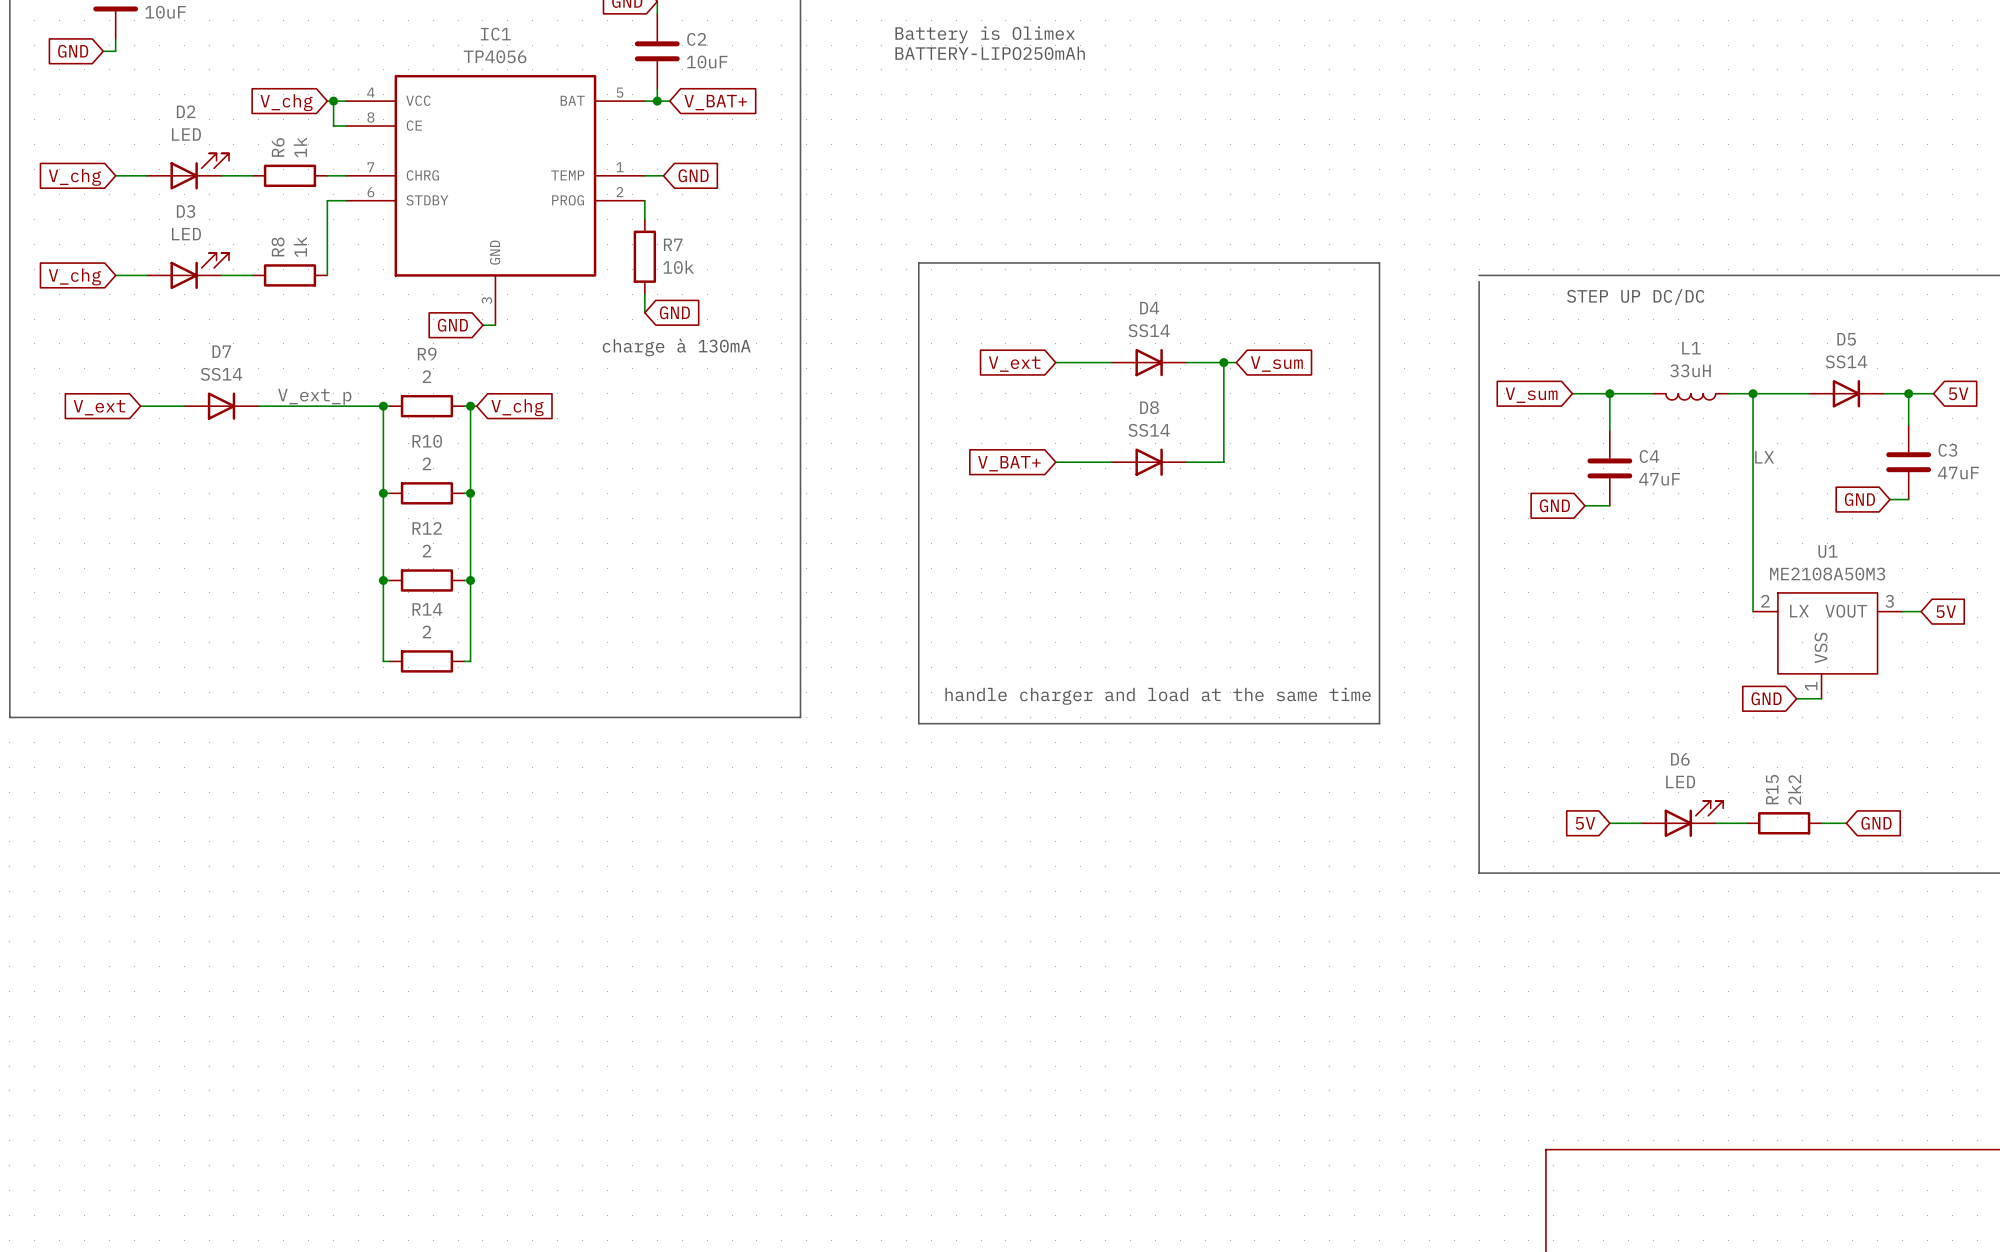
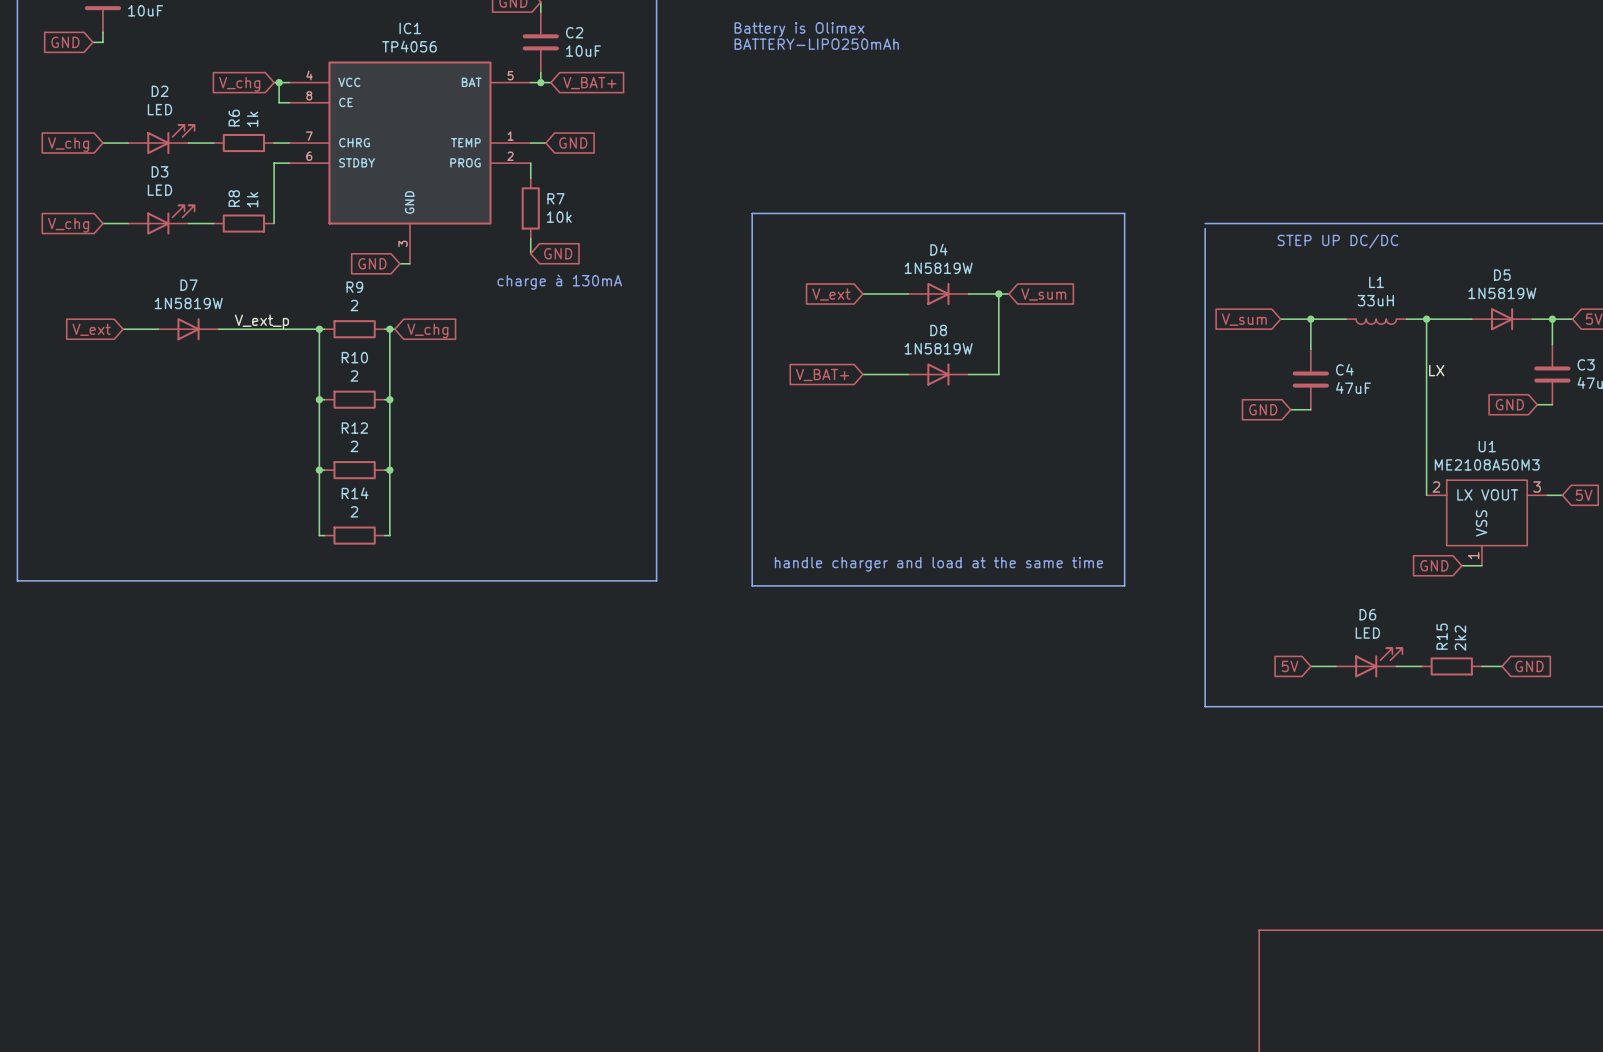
D4 value: SS14 (1149, 330) -> 1N5819W (938, 268)
D5 value: SS14 (1846, 361) -> 1N5819W (1502, 293)
D7 value: SS14 (221, 374) -> 1N5819W (188, 303)
D8 value: SS14 (1149, 430) -> 1N5819W (938, 348)

